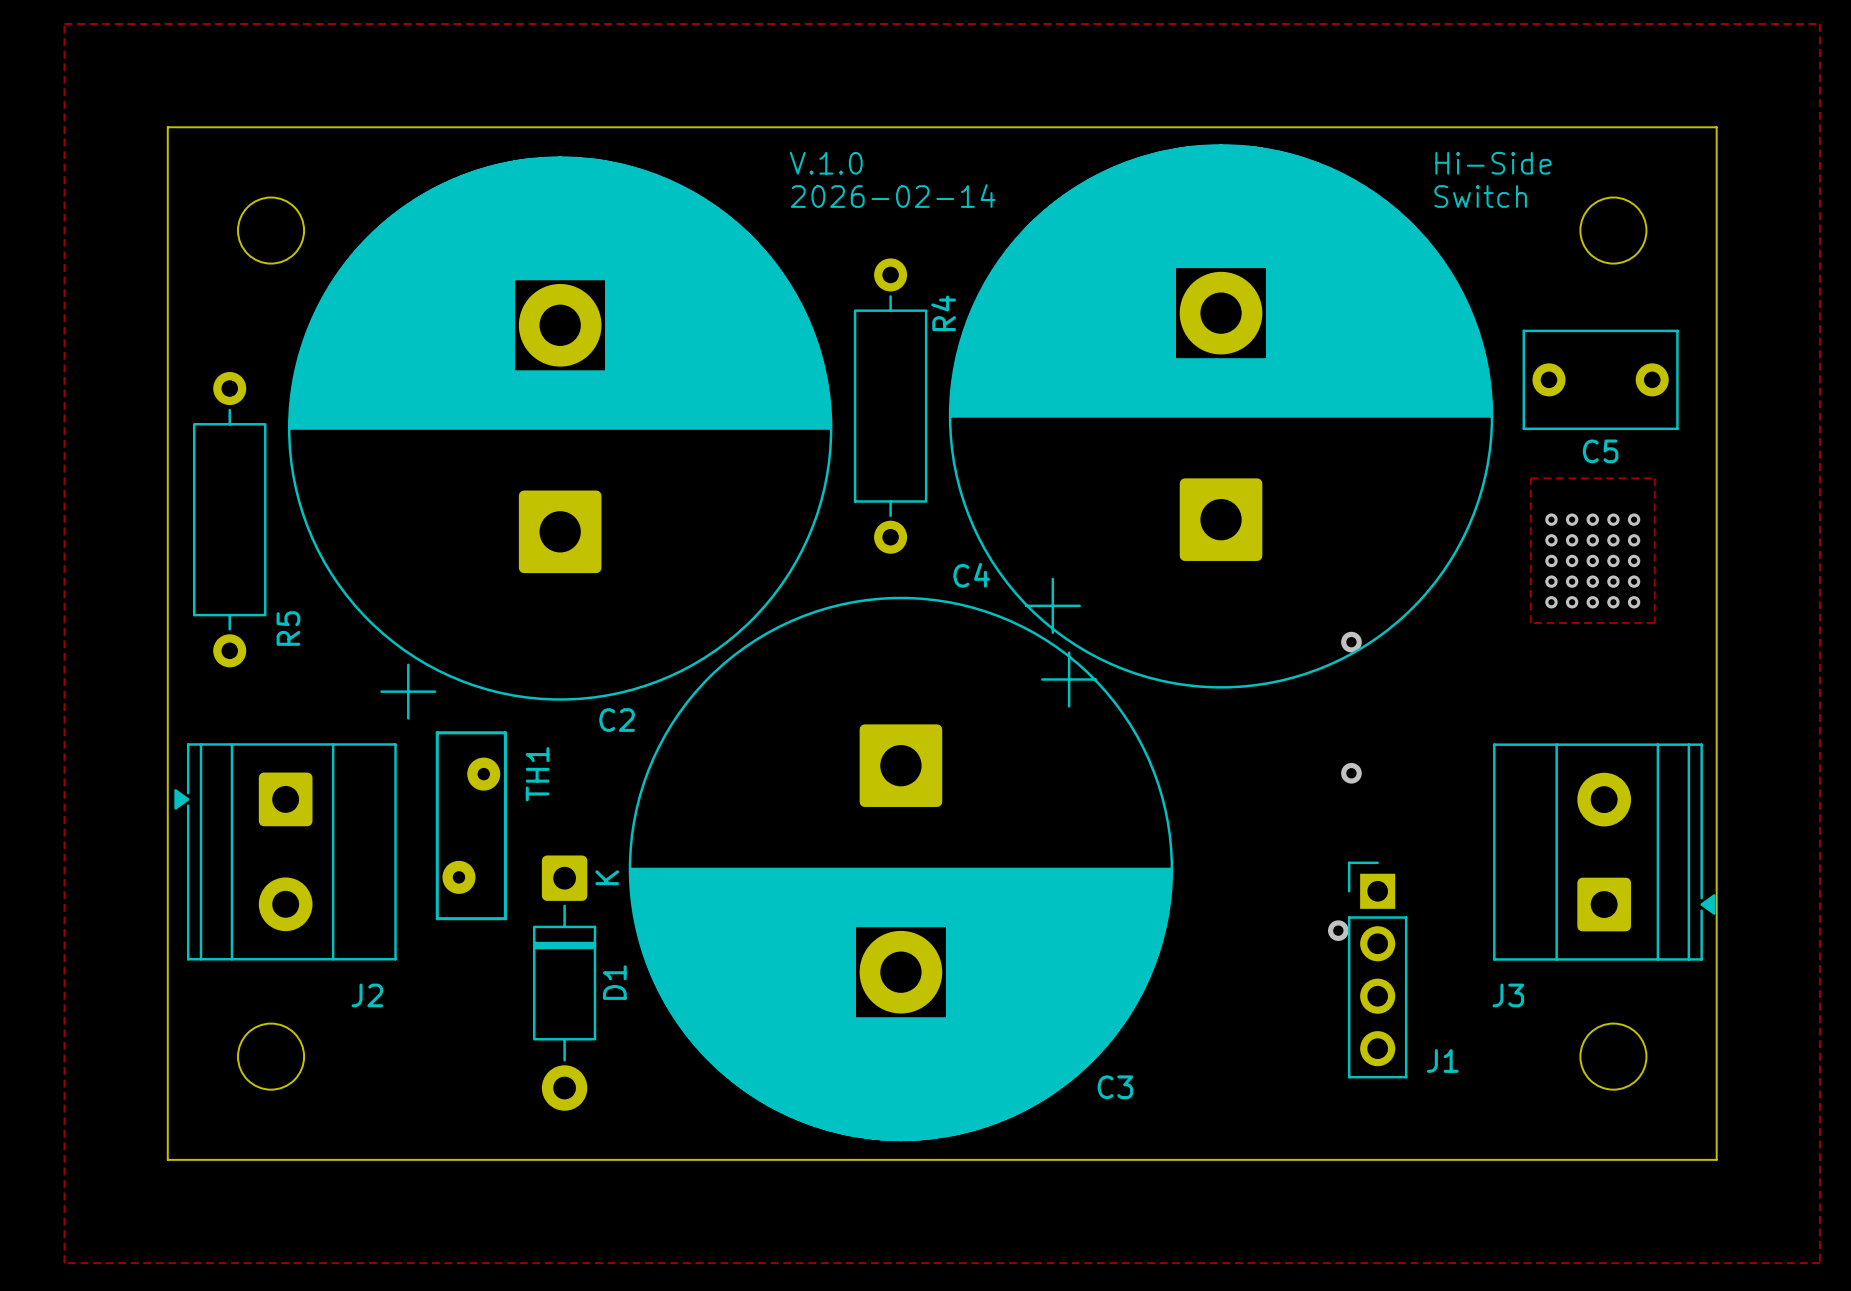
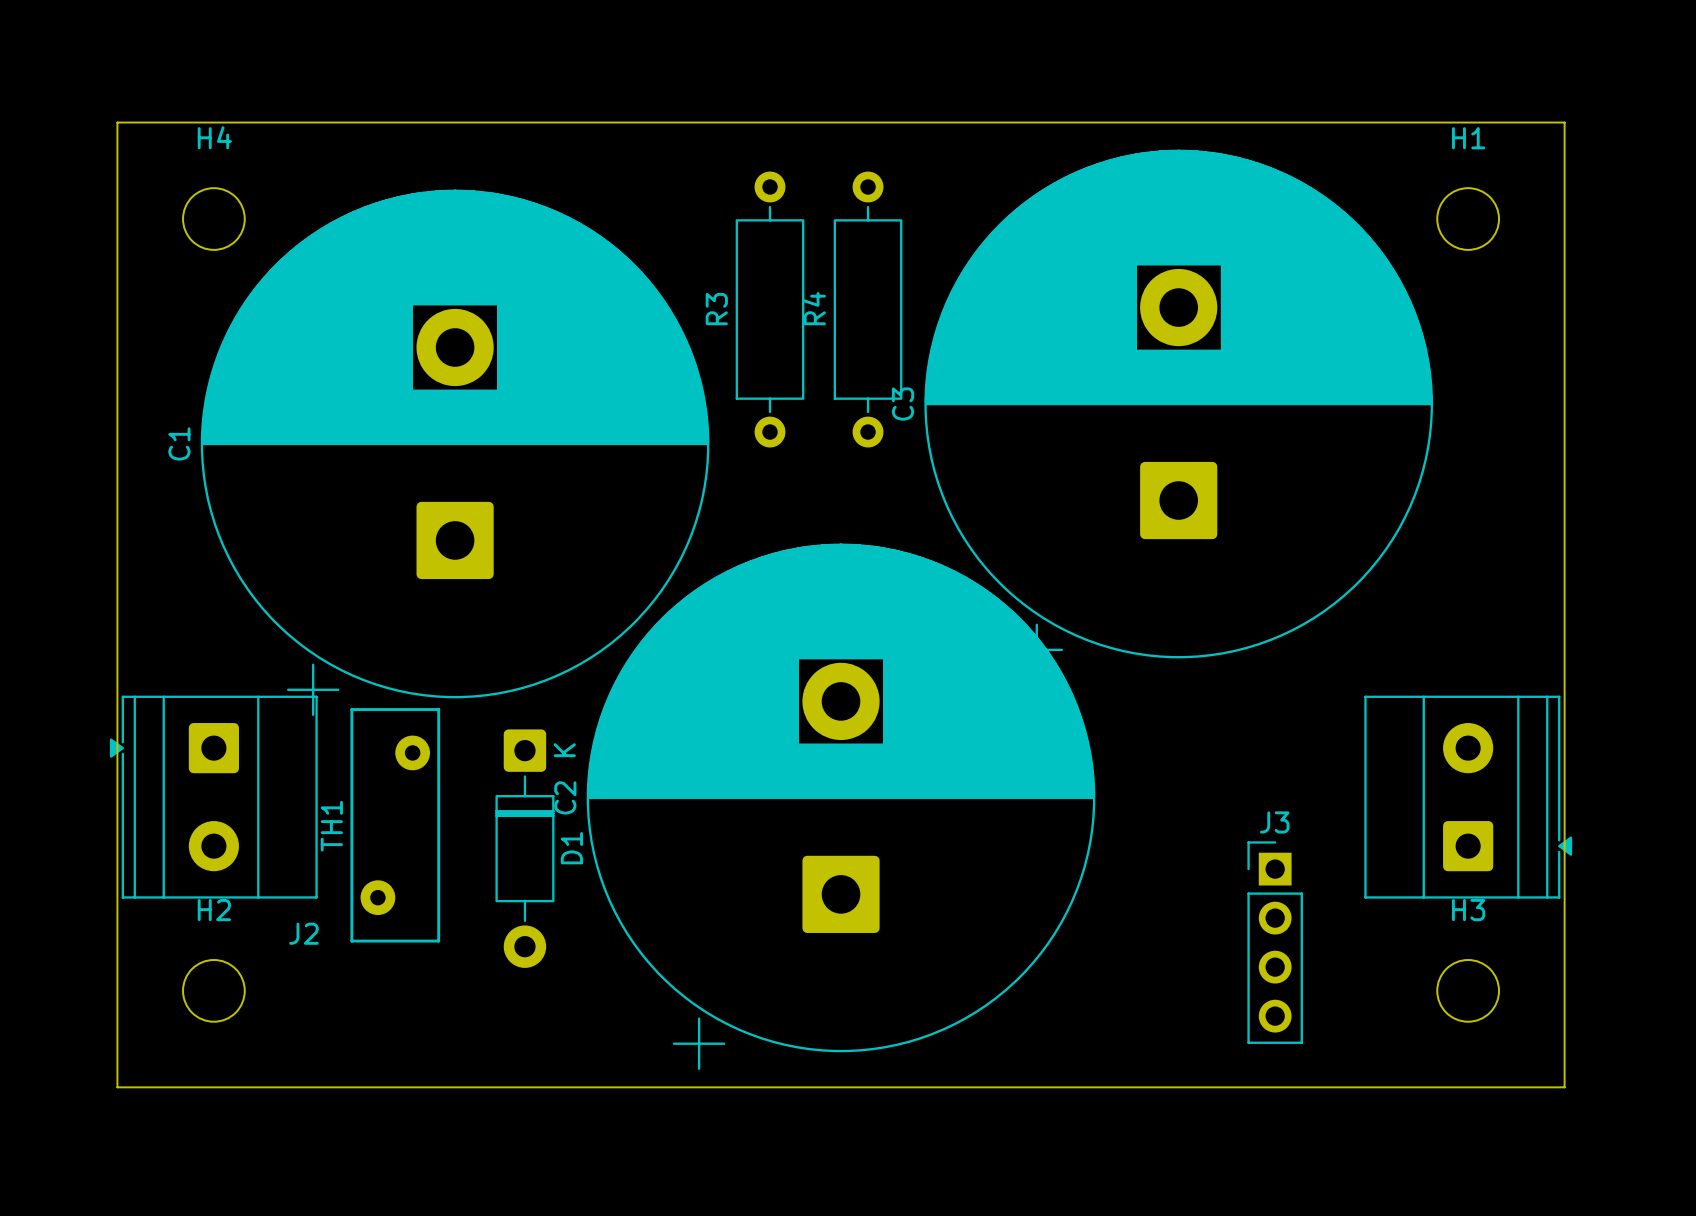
zone outline: (64, 24) (1819, 24) (1819, 1263) (64, 1263) (64, 24) -> none
H4 name: none -> H4 (214, 137)
H1 name: none -> H1 (1468, 138)
text: V.1.0 (826, 163) -> none
text: Hi-Side (1493, 163) -> none
text: 2026-02-14 (893, 196) -> none
text: Switch (1480, 196) -> none
R4 name position: R4 (943, 313) -> R4 (814, 308)
R3: none -> (770, 309)
C5: (1600, 379) -> none
R4 position: (890, 406) -> (868, 309)
C4: (1221, 425) -> none
C2 position: (560, 438) -> (841, 806)
zone outline: (1530, 478) (1654, 478) (1654, 622) (1530, 622) (1530, 478) -> none
C1: none -> (455, 452)
R5: (229, 519) -> none
via: (1551, 519) -> none
via: (1572, 519) -> none
via: (1592, 519) -> none
via: (1613, 519) -> none
via: (1634, 519) -> none
via: (1551, 540) -> none
via: (1572, 540) -> none
via: (1592, 540) -> none
via: (1613, 540) -> none
via: (1634, 540) -> none
via: (1551, 560) -> none
via: (1572, 560) -> none
via: (1592, 560) -> none
via: (1613, 560) -> none
via: (1634, 560) -> none
via: (1551, 581) -> none
via: (1572, 581) -> none
via: (1592, 581) -> none
via: (1613, 581) -> none
via: (1634, 581) -> none
via: (1551, 602) -> none
via: (1572, 602) -> none
via: (1592, 602) -> none
via: (1613, 602) -> none
via: (1634, 602) -> none
via: (1351, 642) -> none
C2 name rotation: 0° (617, 720) -> 90° counterclockwise (565, 797)
C2 name position: C2 (617, 720) -> C2 (565, 797)
TH1 footprint: [435, 731, 507, 921] -> [350, 708, 441, 943]
J3 footprint: [1493, 743, 1716, 961] -> [1247, 841, 1303, 1044]
via: (1351, 773) -> none
TH1 name position: TH1 (537, 774) -> TH1 (331, 826)
part: none -> (1468, 797)
J2 position: (285, 851) -> (213, 797)
C3 rotation: 0° (900, 859) -> 180° (1178, 412)
C3 position: (900, 859) -> (1178, 412)
via: (1338, 930) -> none
J1: (1377, 969) -> none
H2 name: none -> H2 (214, 910)
H3 name: none -> H3 (1468, 910)
D1 position: (564, 983) -> (524, 848)
J3 name position: J3 (1508, 995) -> J3 (1274, 822)
C3 name position: C3 (1115, 1087) -> C3 (903, 404)

